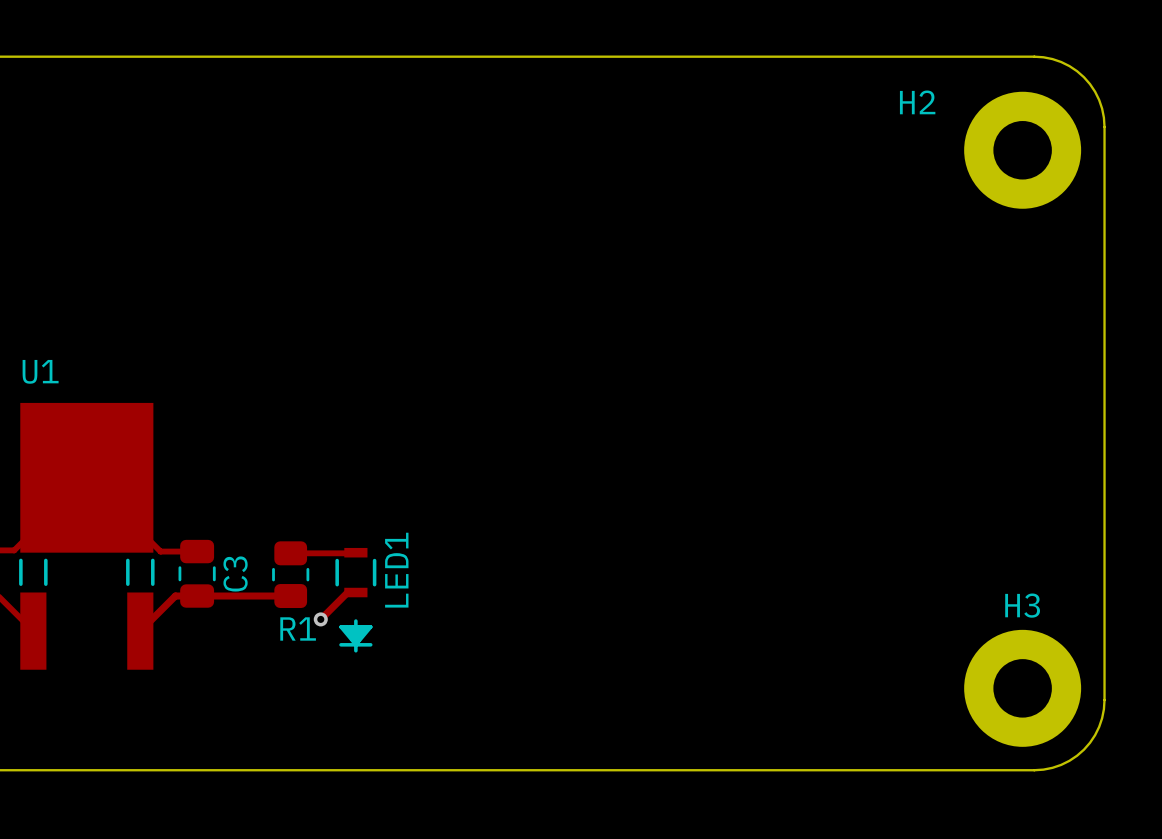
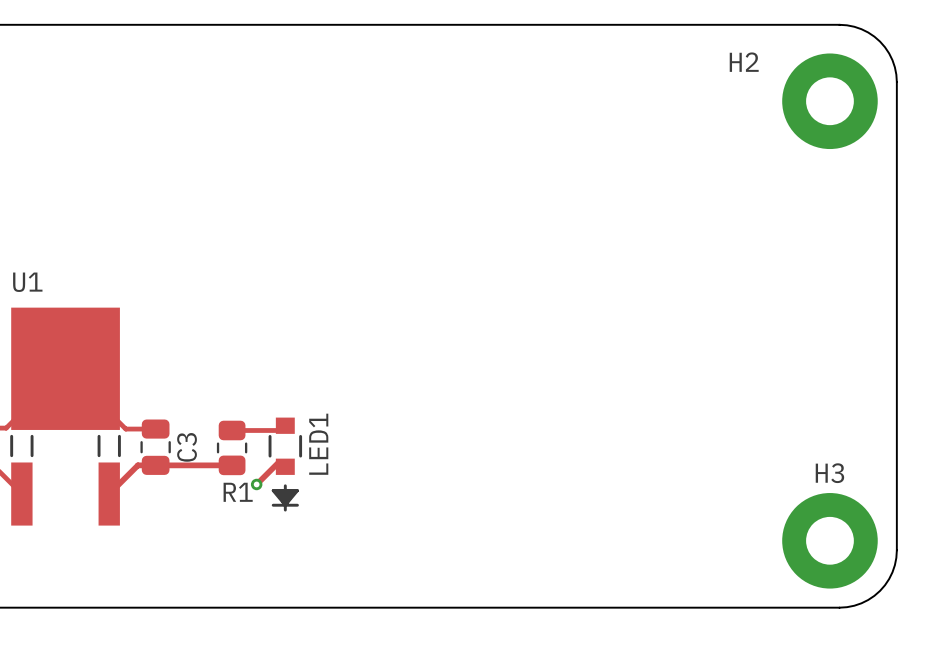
LED1 footprint: [335, 547, 377, 653] -> [268, 417, 303, 512]

